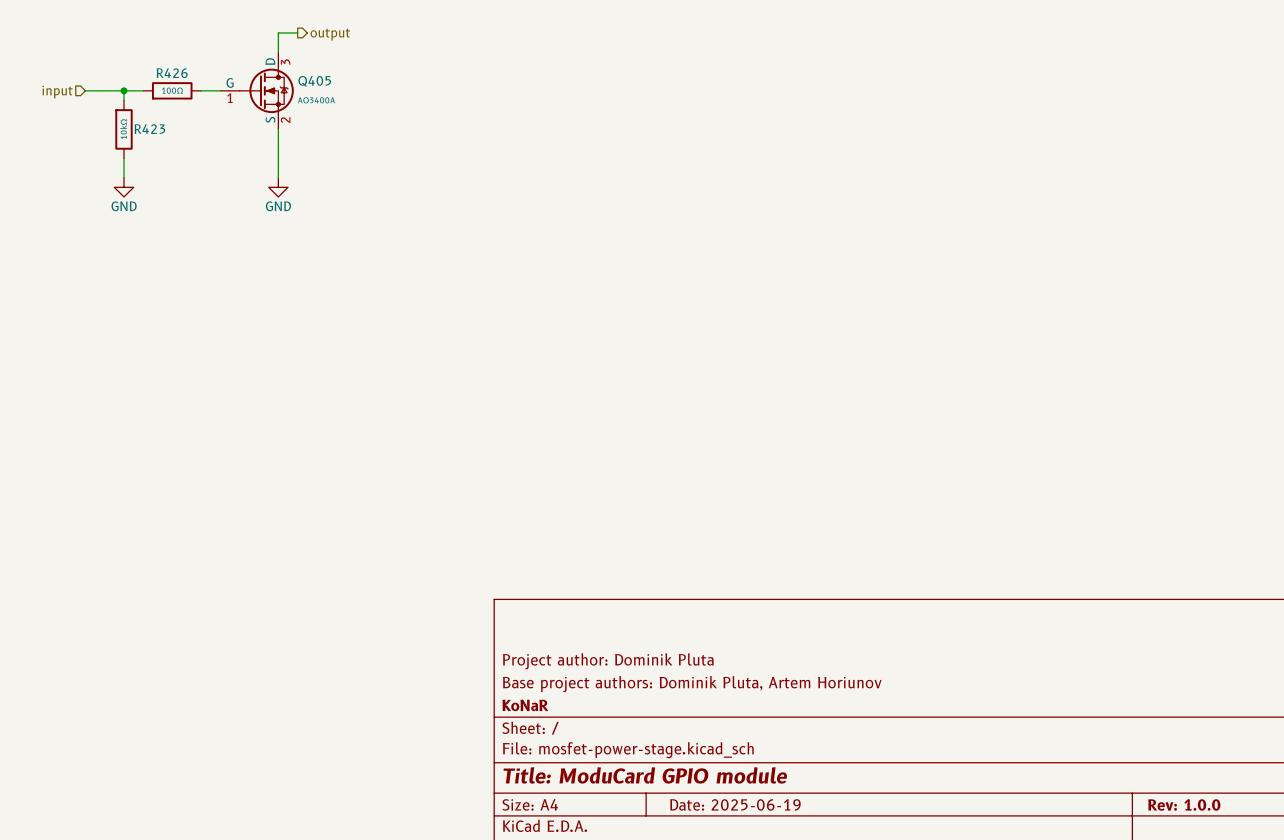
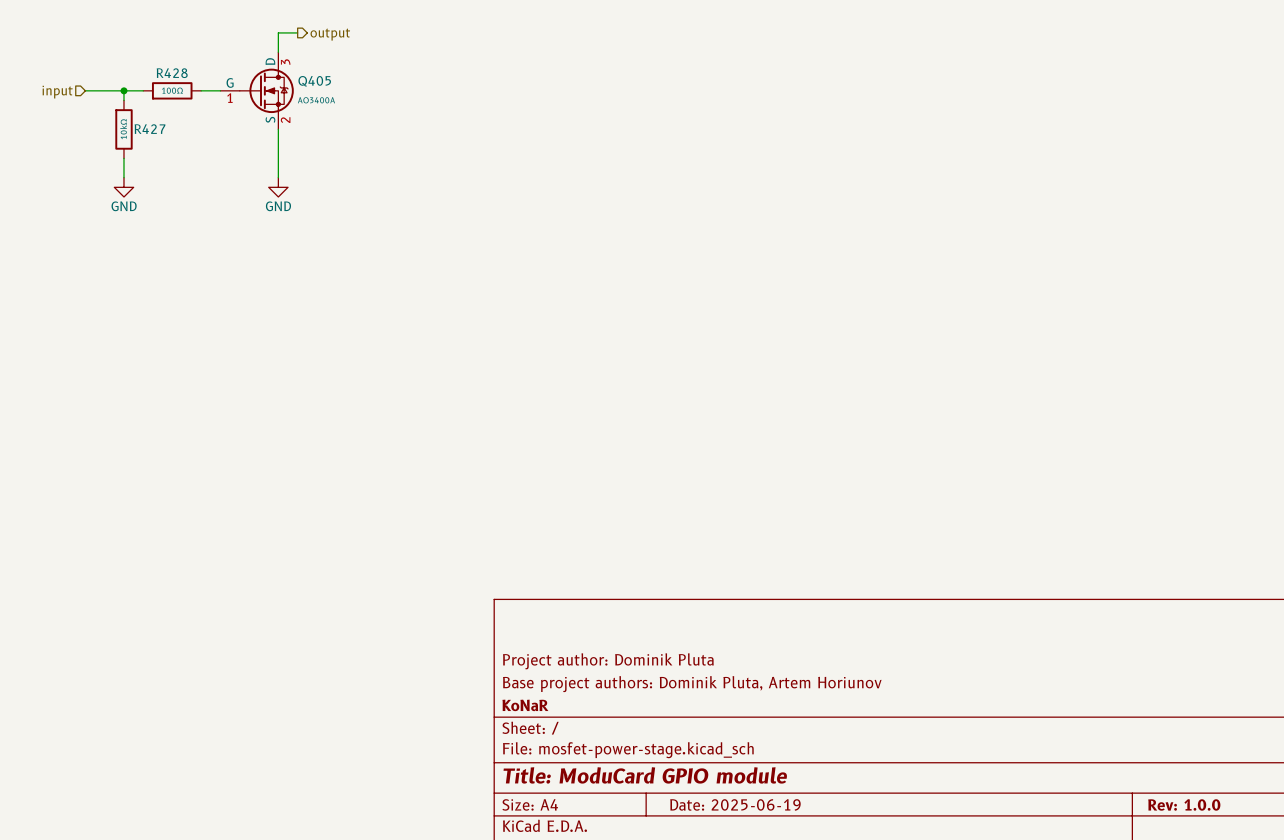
R426 name: R426 (172, 73) -> R428 (172, 73)
R423 name: R423 (149, 129) -> R427 (150, 129)

